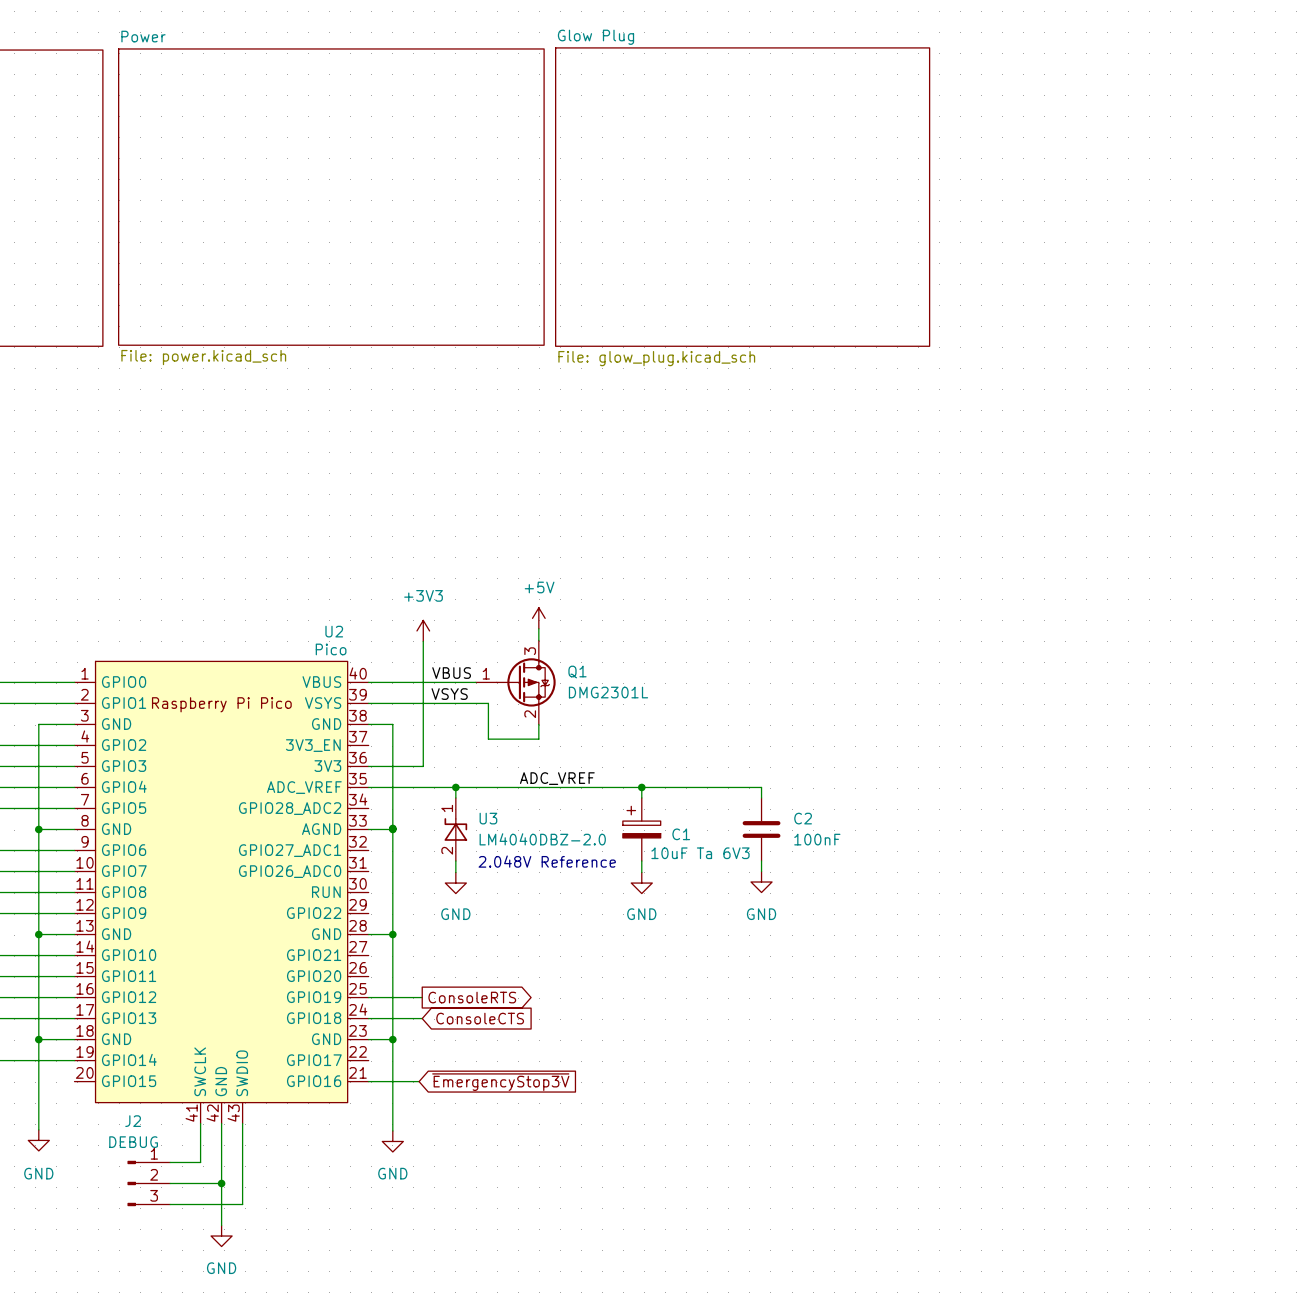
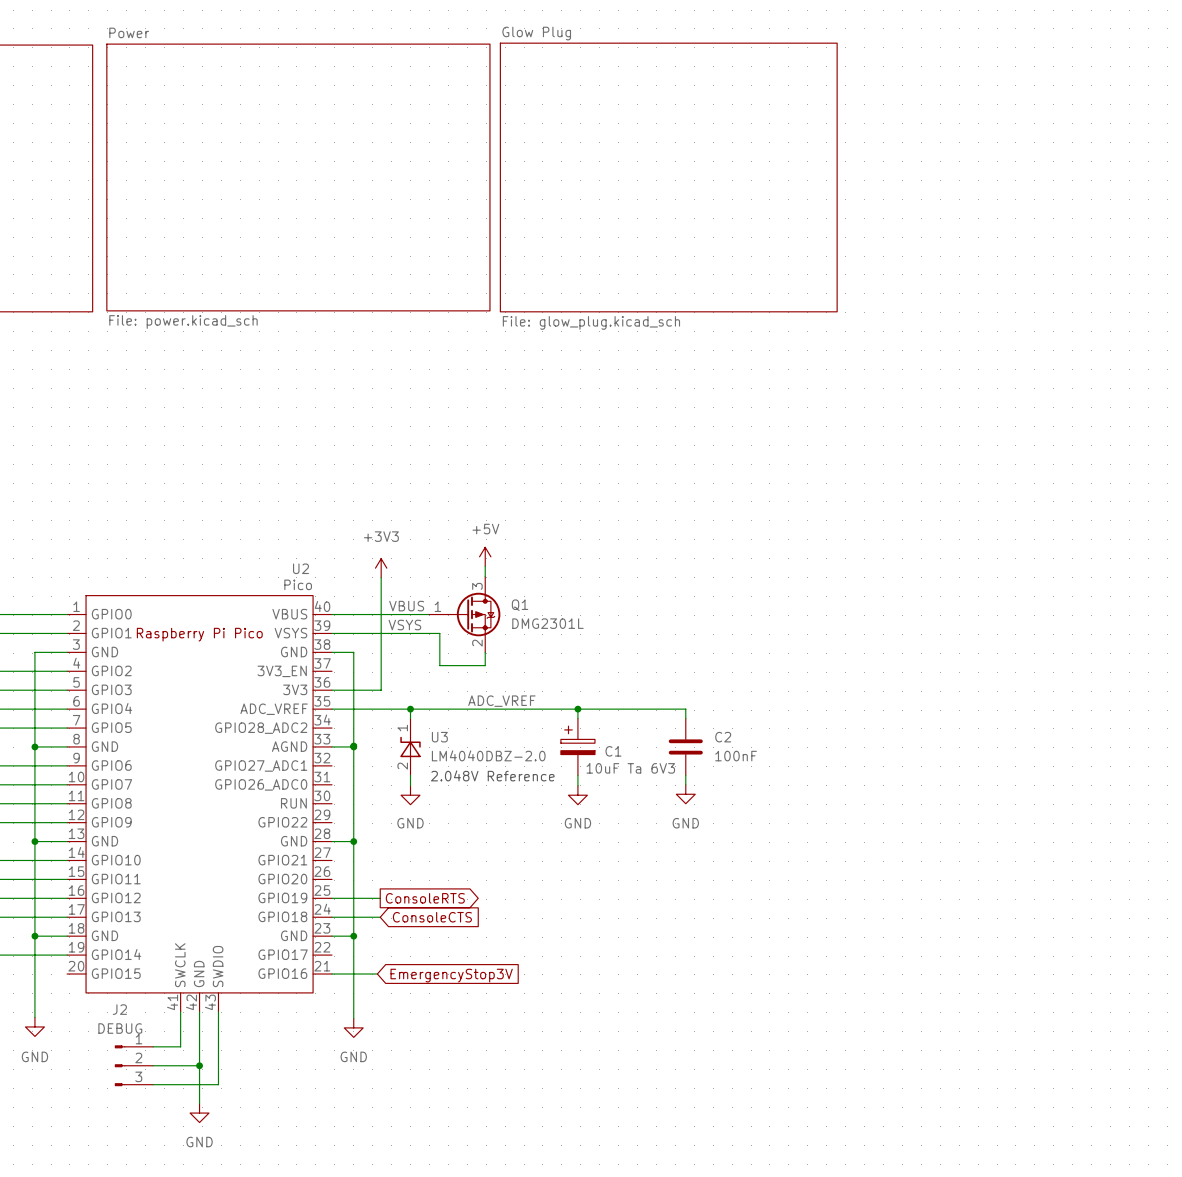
global label: ~{EmergencyStop3V} (500, 1082) -> EmergencyStop3V (451, 975)

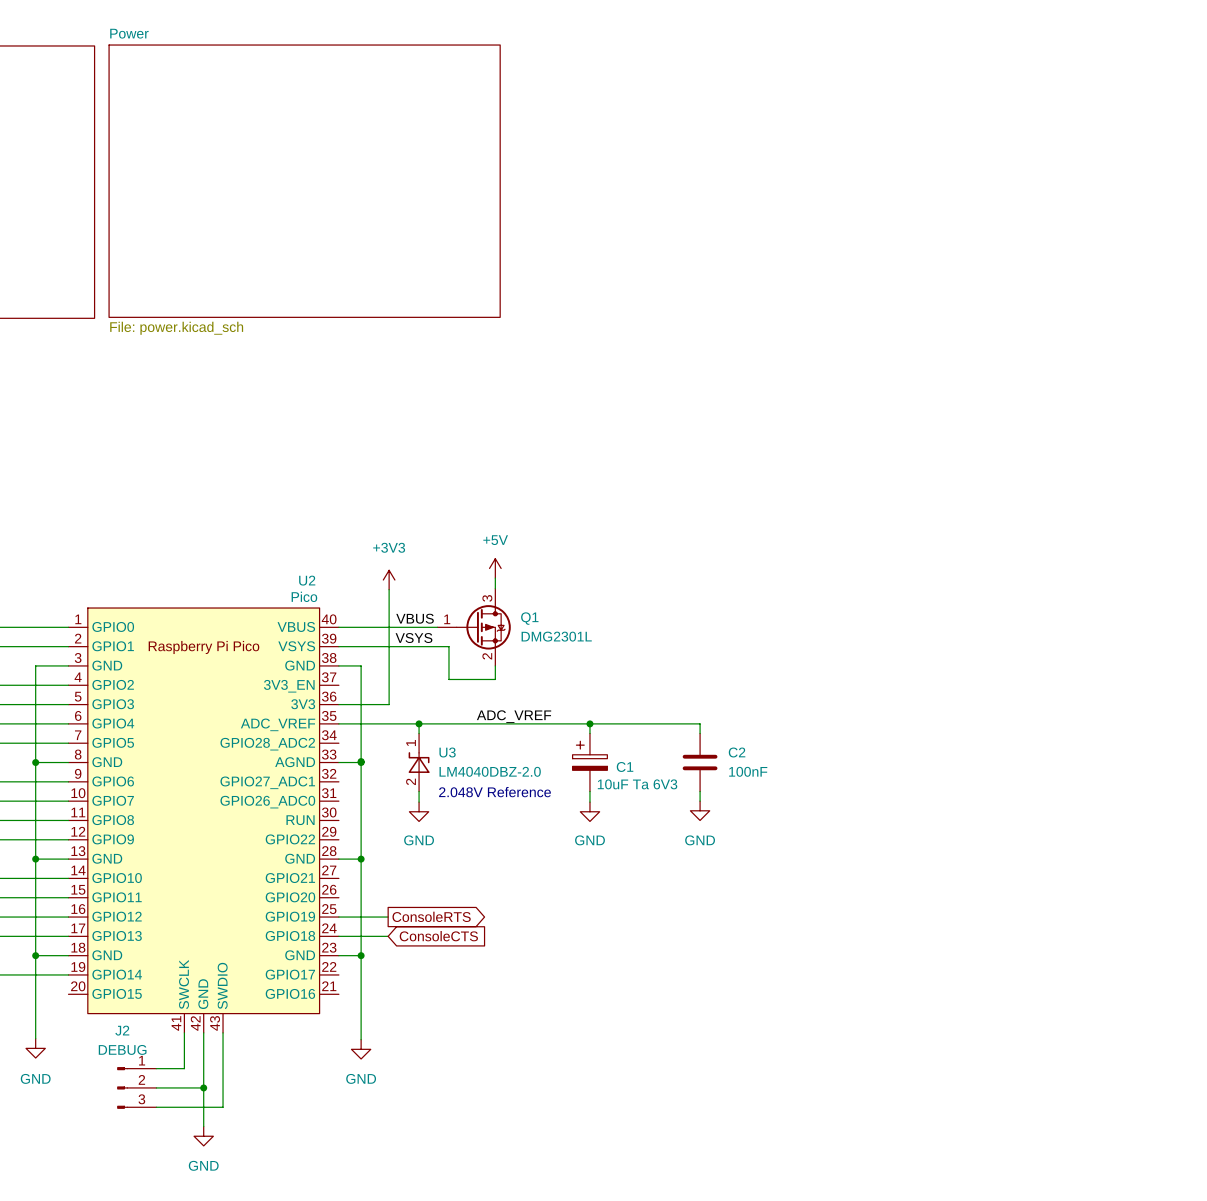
sheet Glow Plug: File: glow_plug.kicad_sch (668, 177) -> none
wire: (331, 974) (377, 974) -> none
global label: EmergencyStop3V (451, 975) -> none

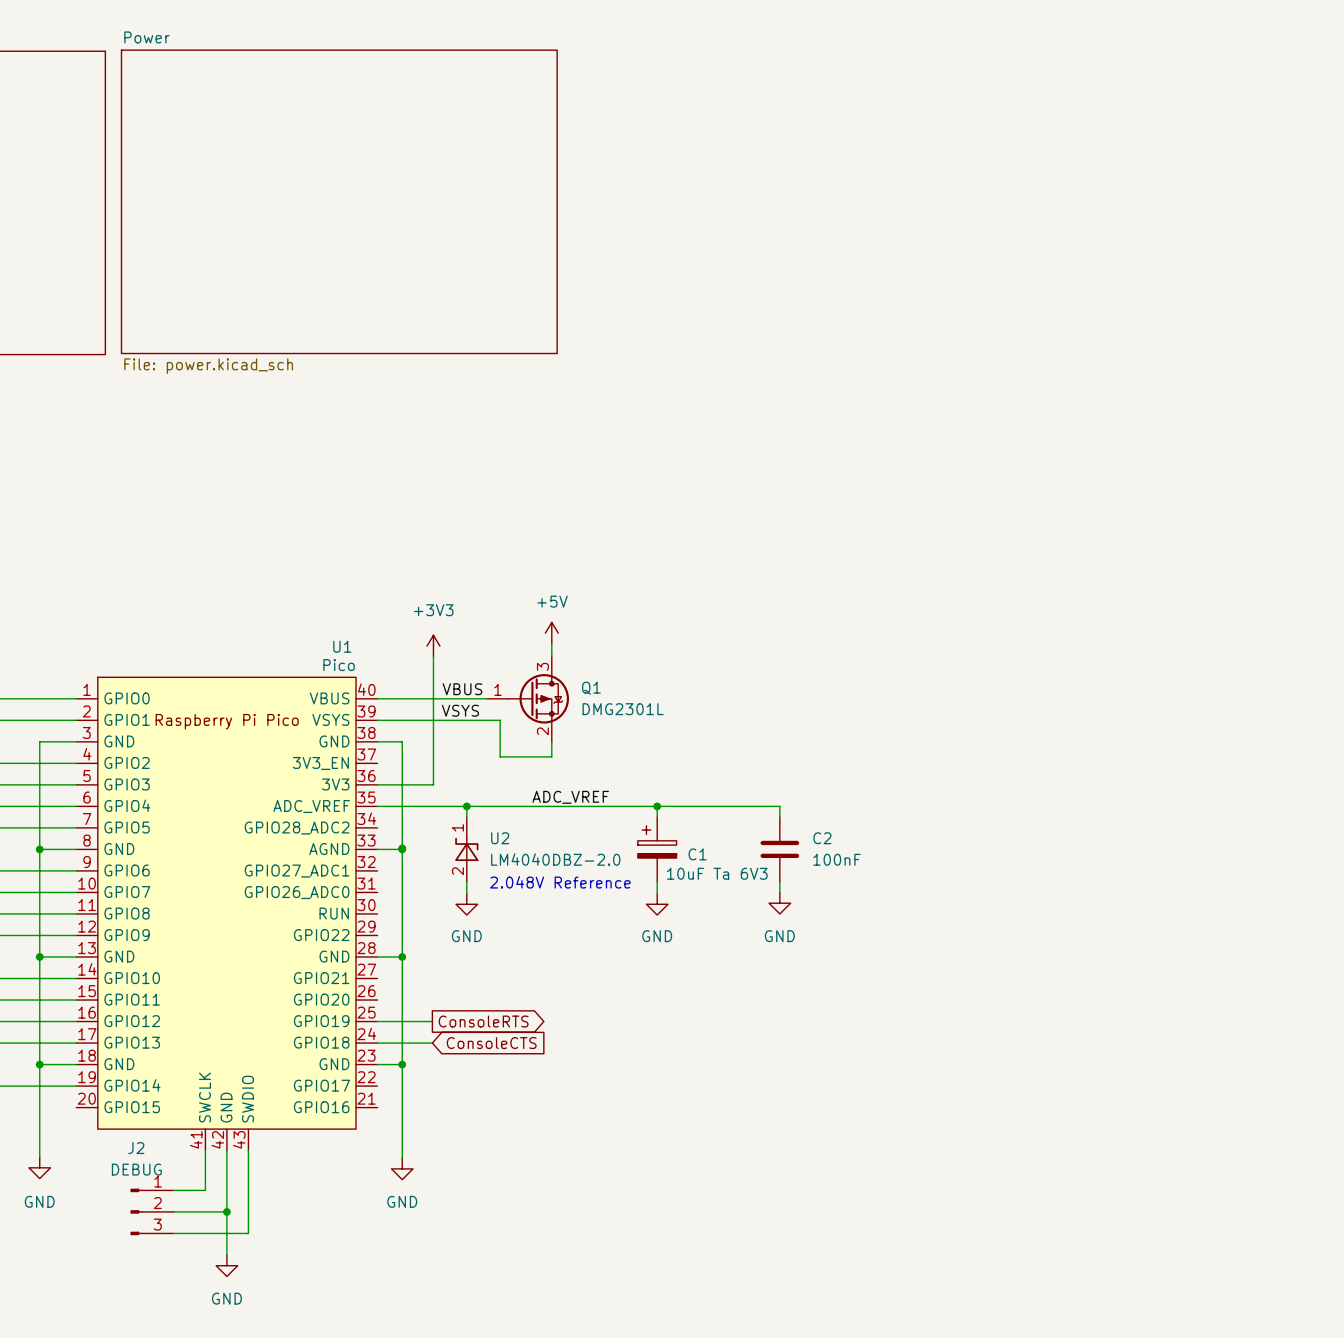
U2 name: U2 (307, 580) -> U1 (342, 646)
U3 name: U3 (447, 752) -> U2 (500, 838)

